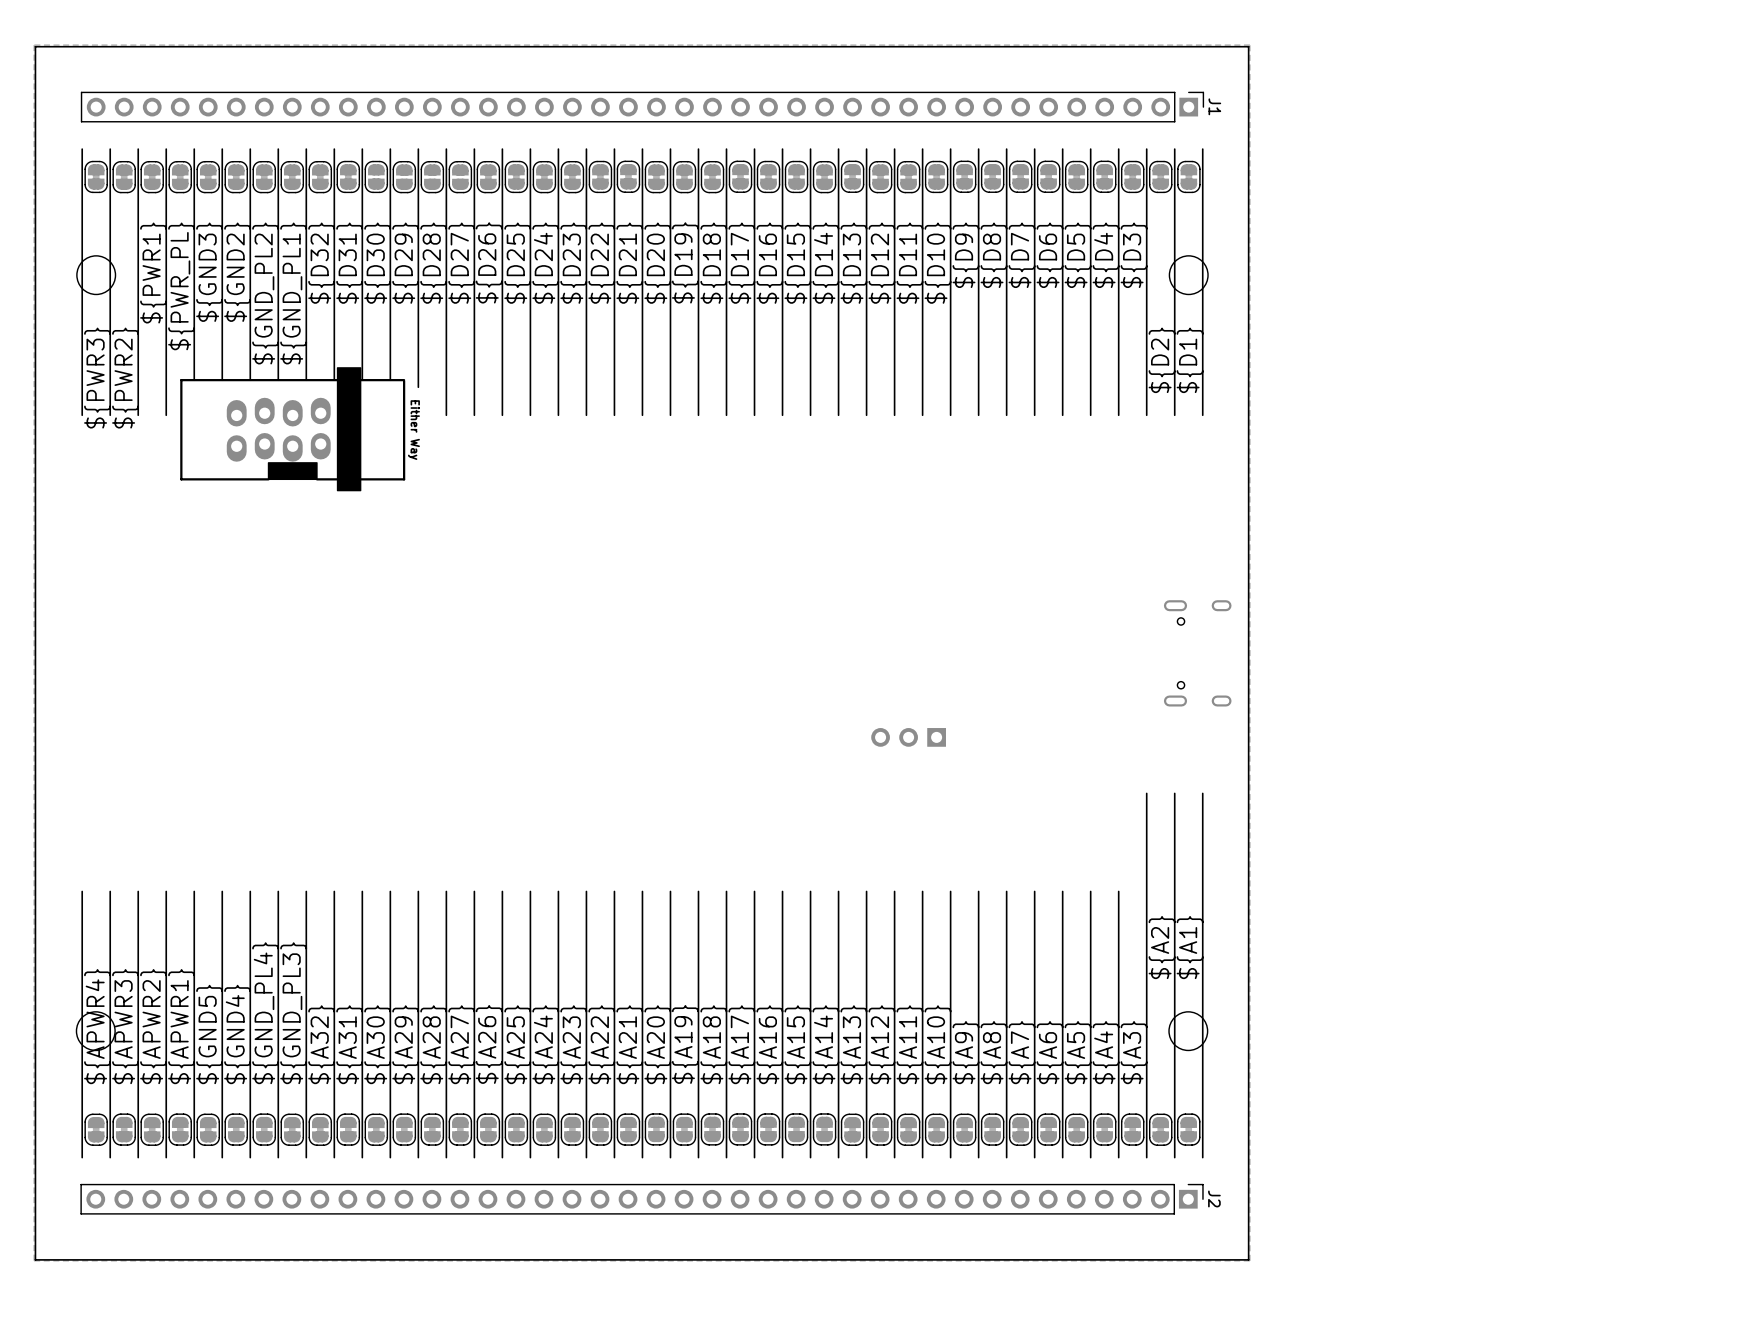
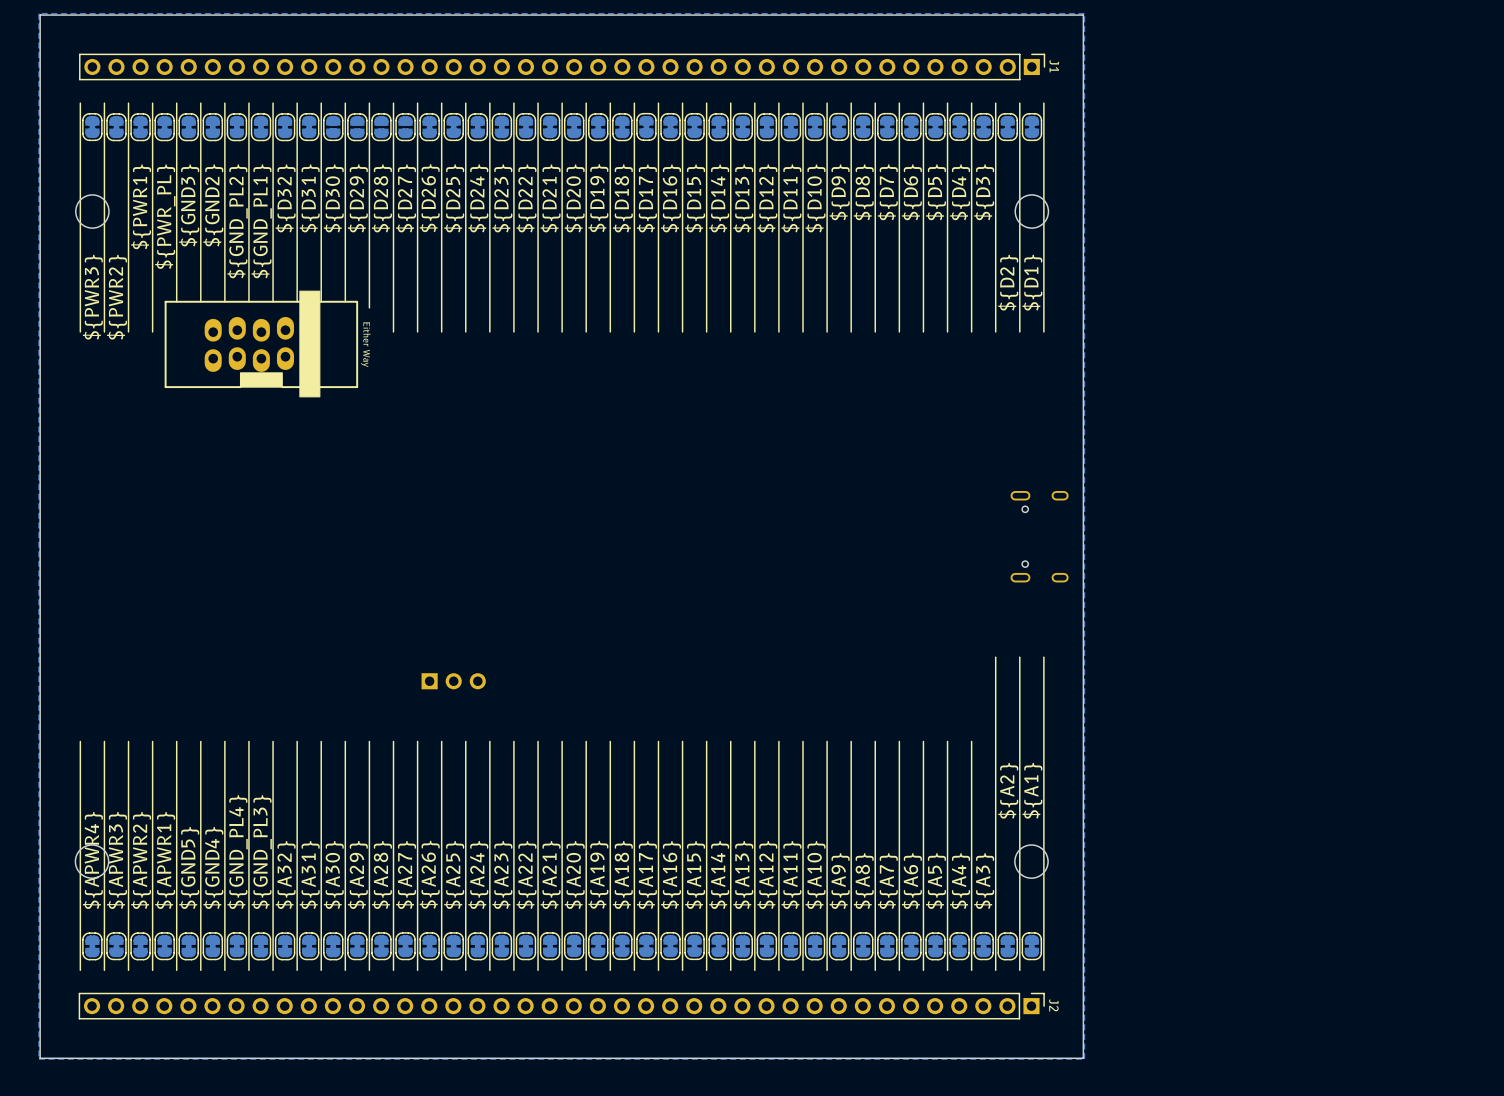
part: (908, 737) -> none
part: none -> (453, 681)

